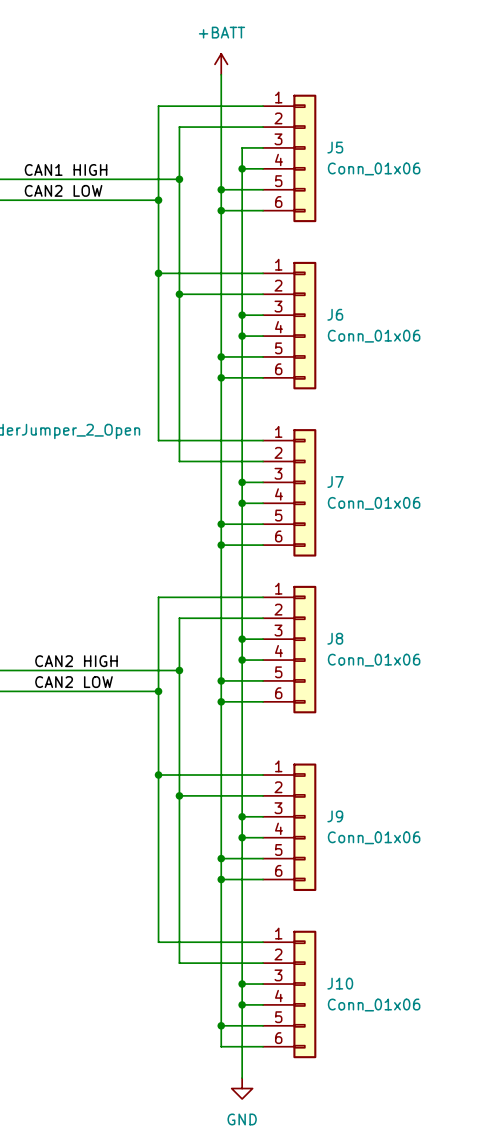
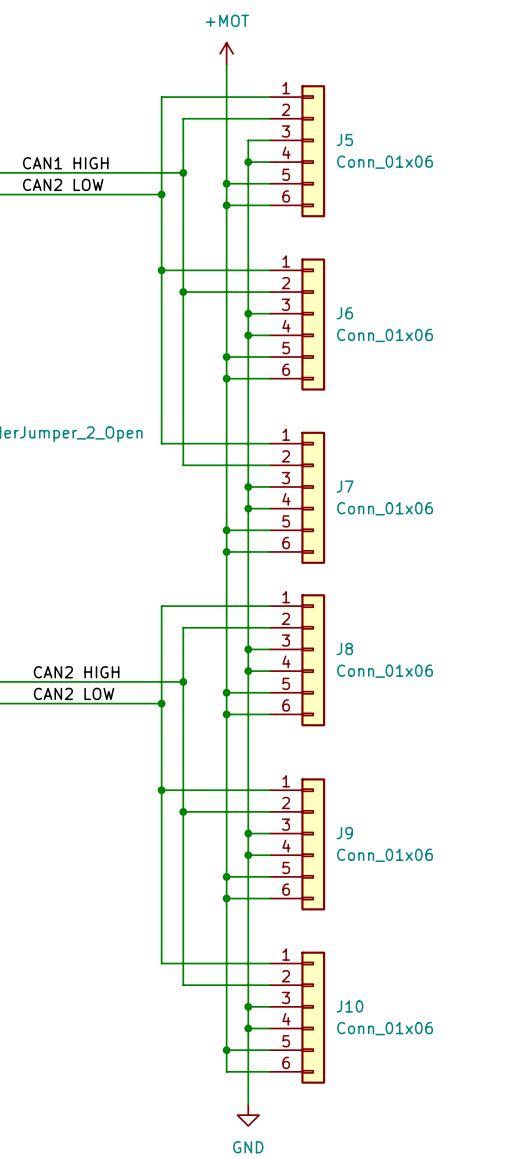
power symbol: +BATT (221, 64) -> +MOT (226, 53)

